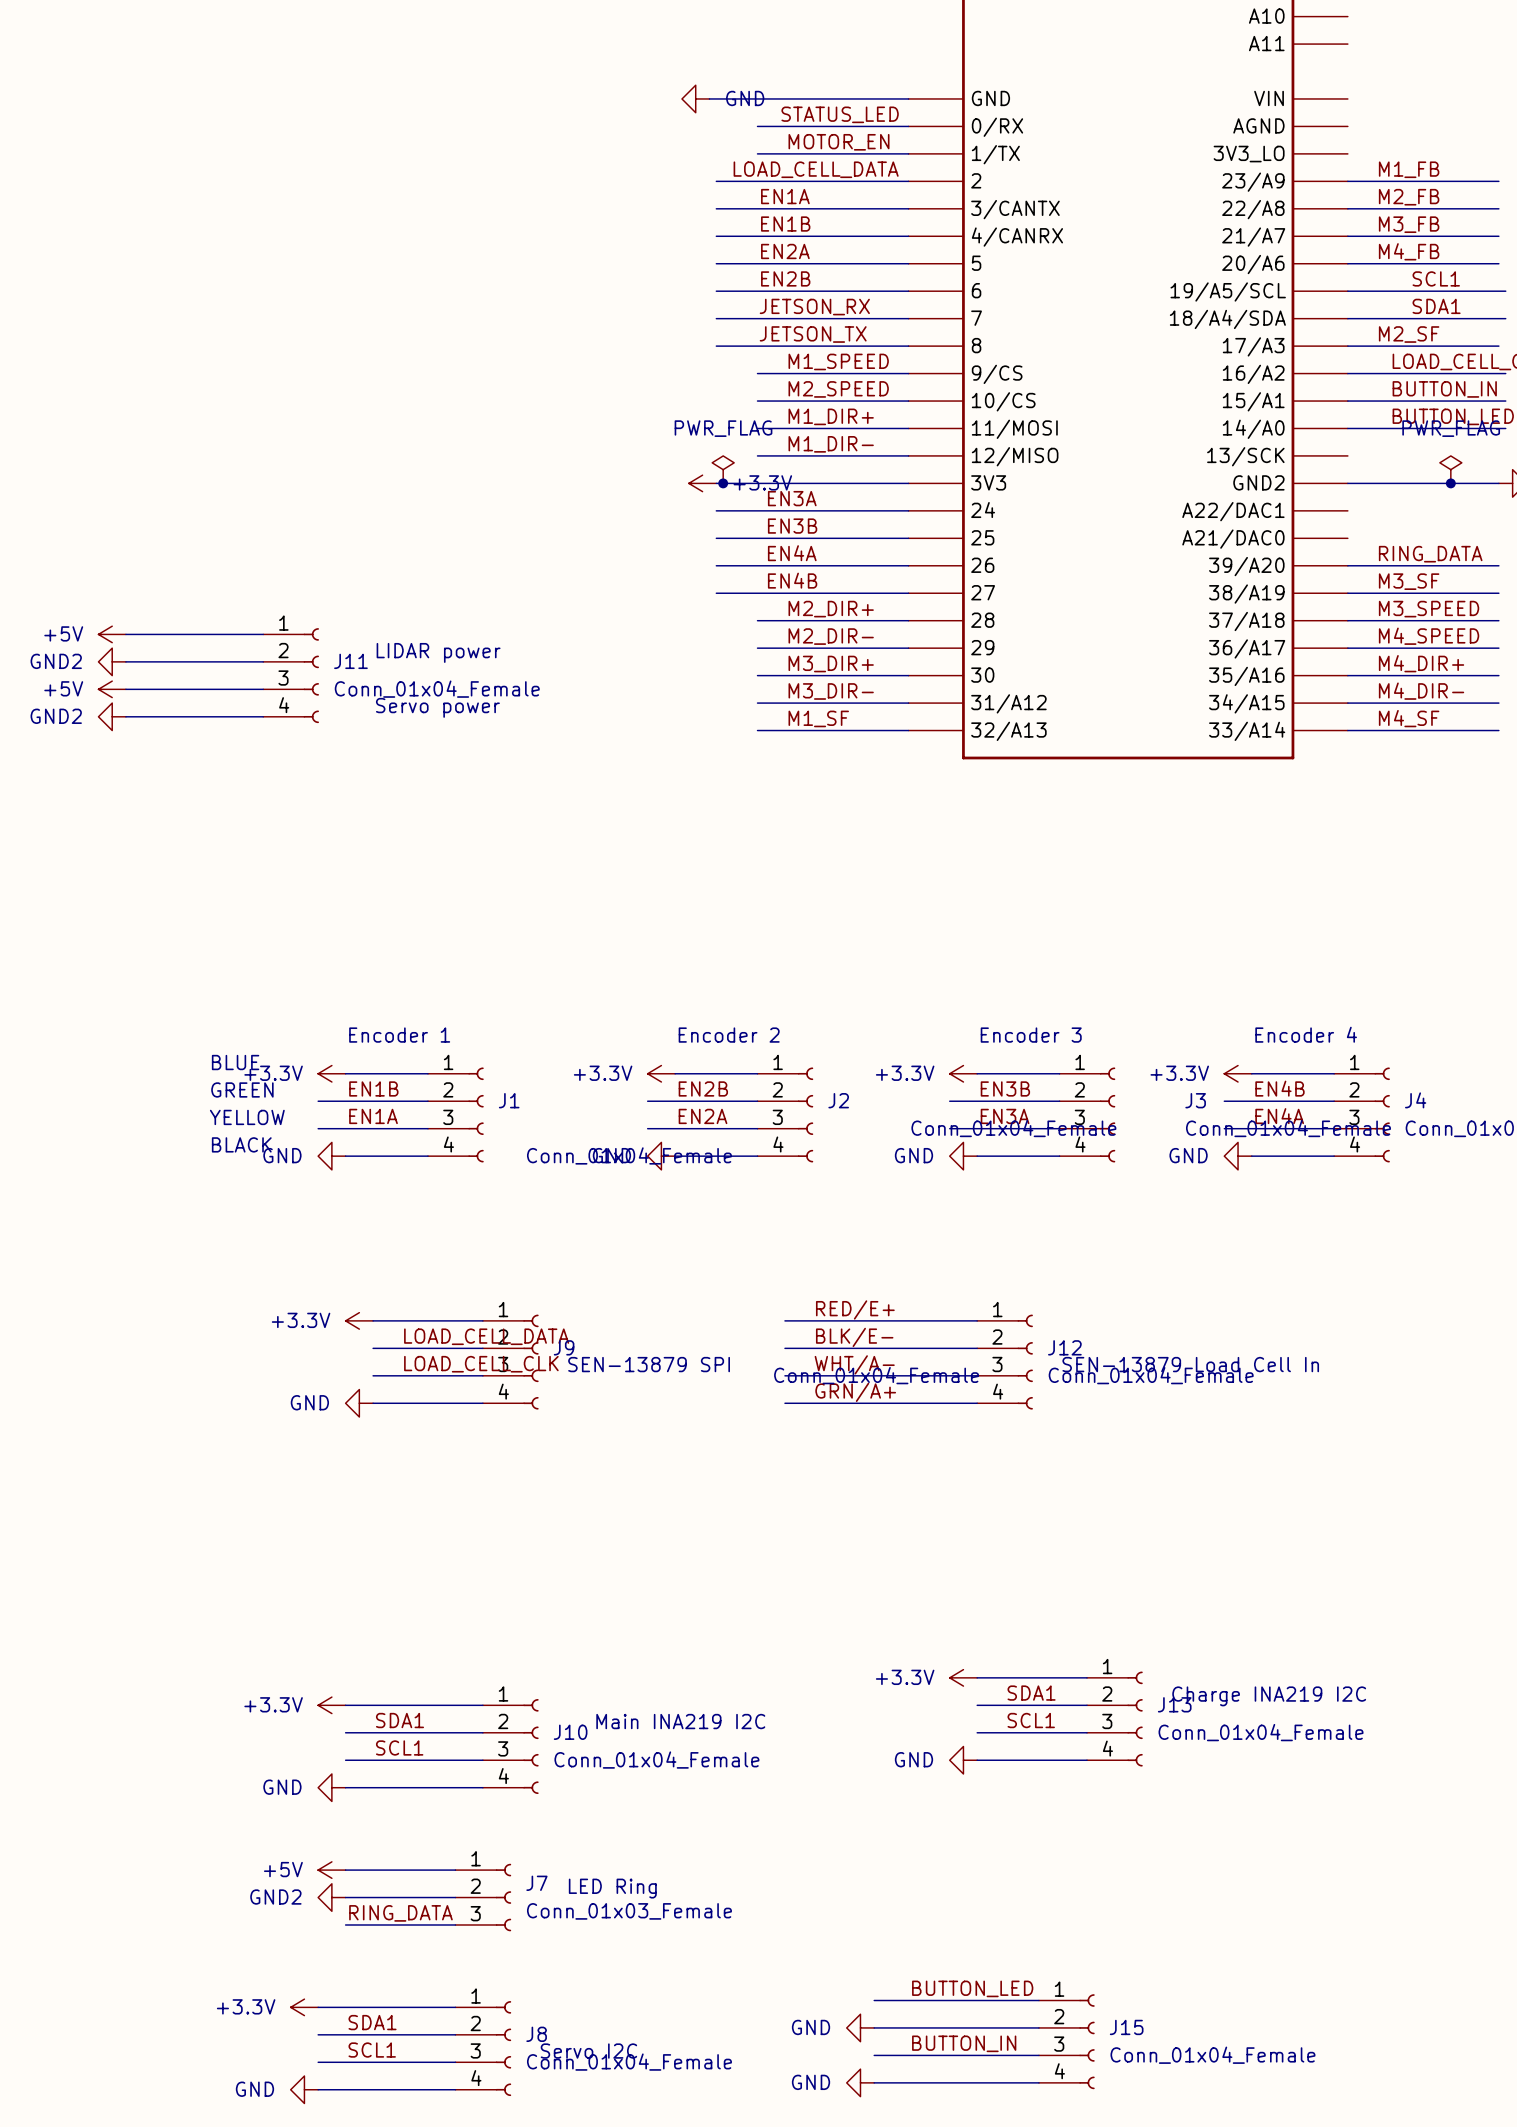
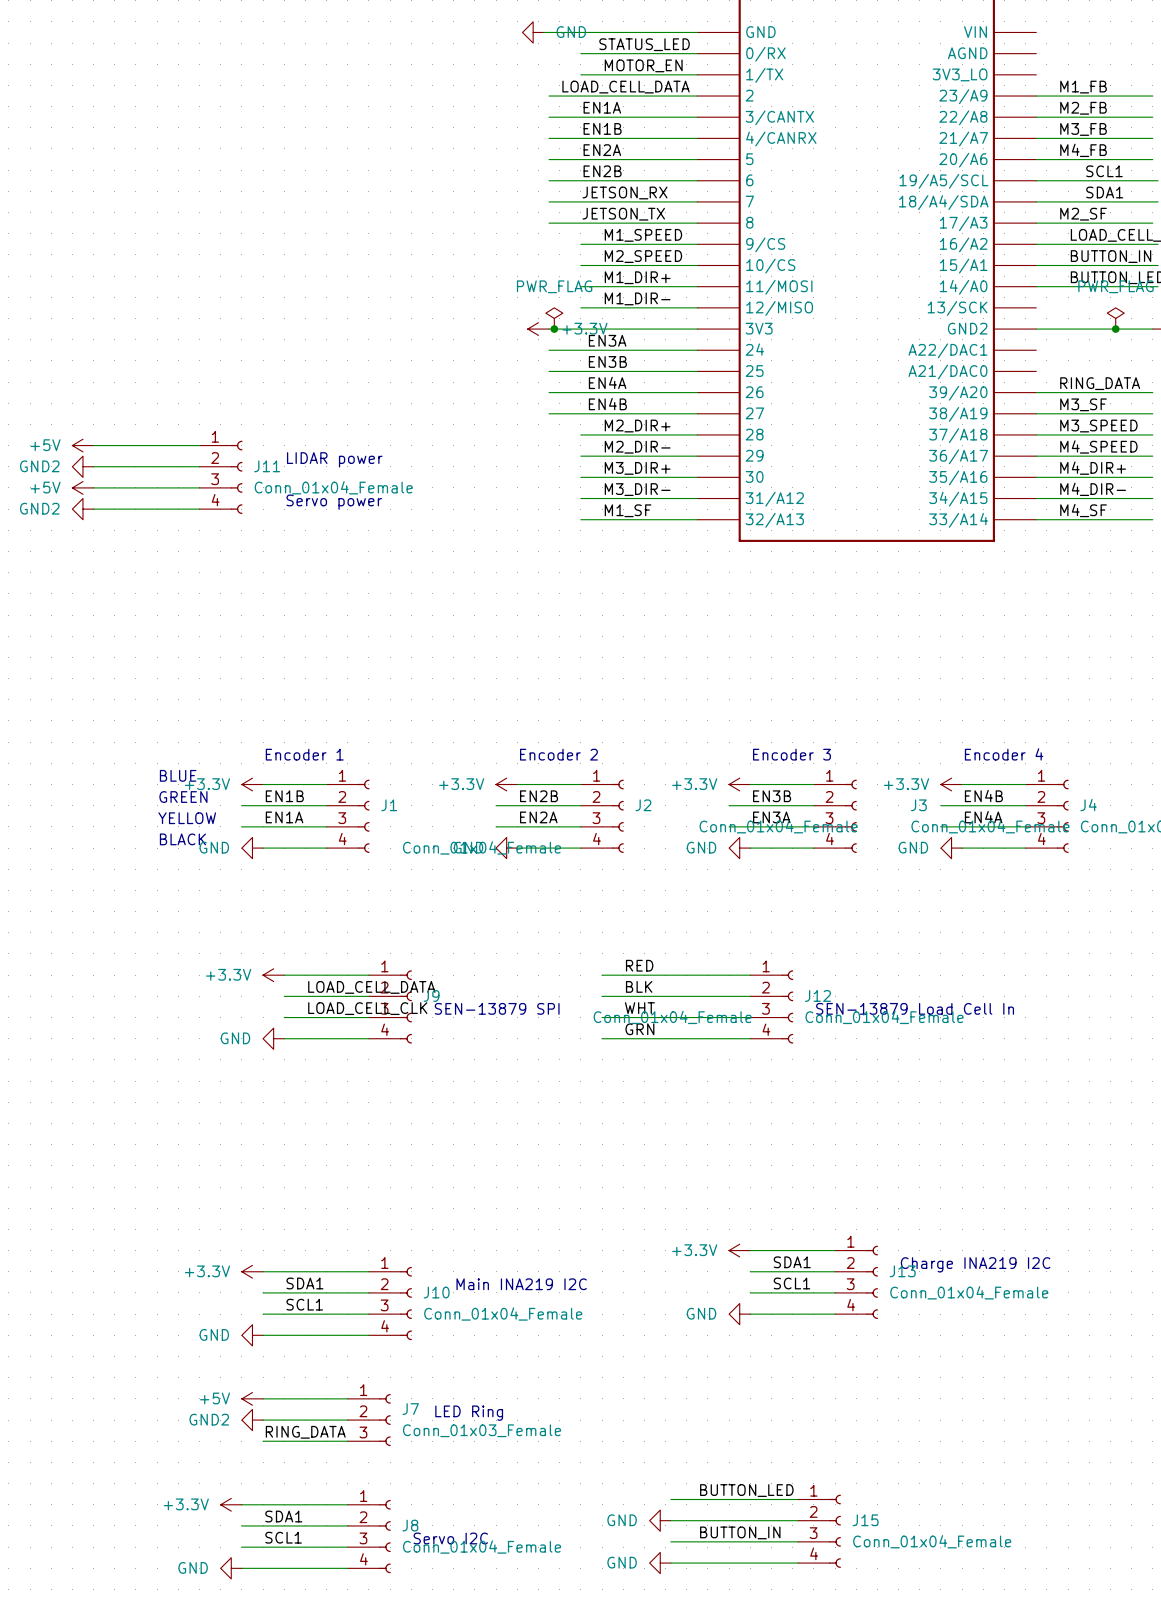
label: RED/E+ (855, 1309) -> RED (639, 965)
label: BLK/E- (854, 1337) -> BLK (639, 986)
label: WHT/A- (854, 1364) -> WHT (639, 1008)
label: GRN/A+ (855, 1392) -> GRN (639, 1029)

